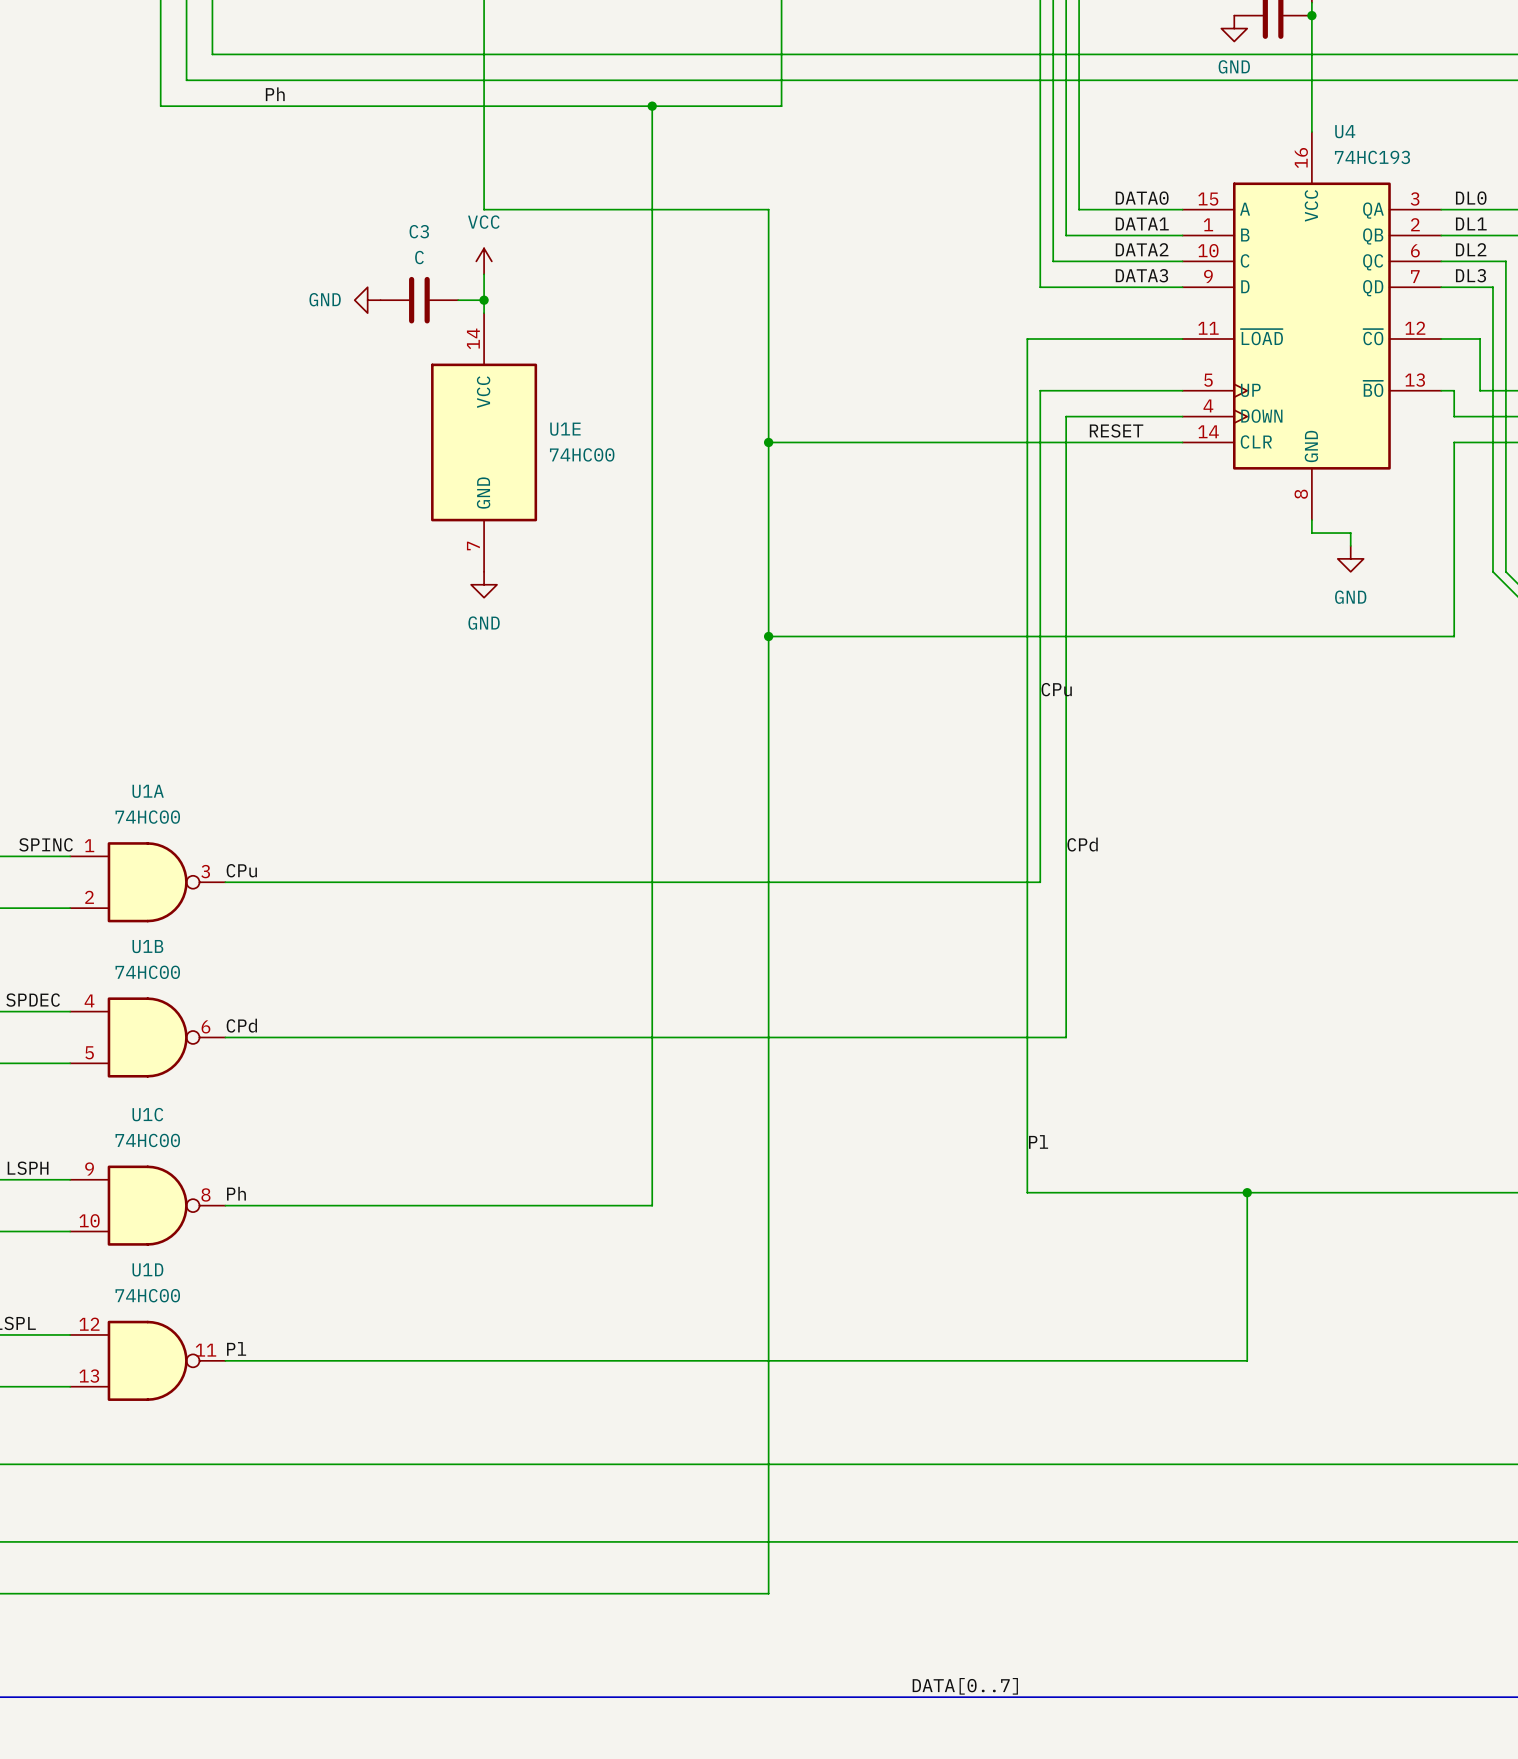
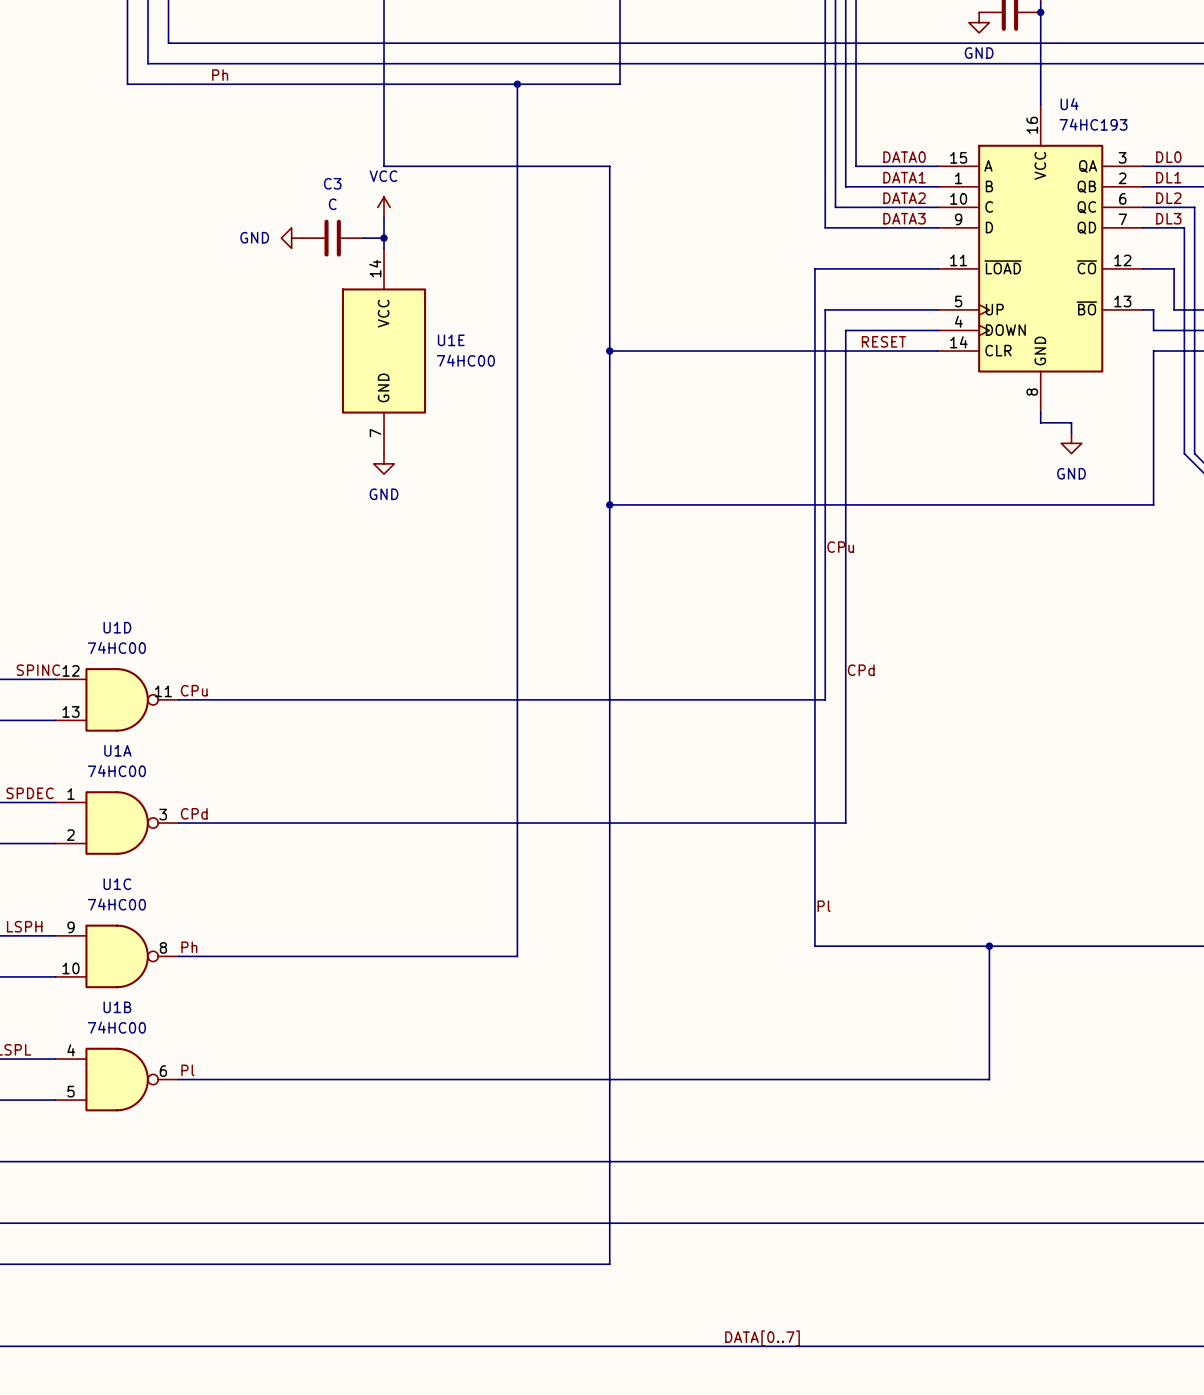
U1A position: (147, 882) -> (117, 823)
U1B position: (147, 1037) -> (117, 1079)
U1D position: (147, 1360) -> (117, 699)

